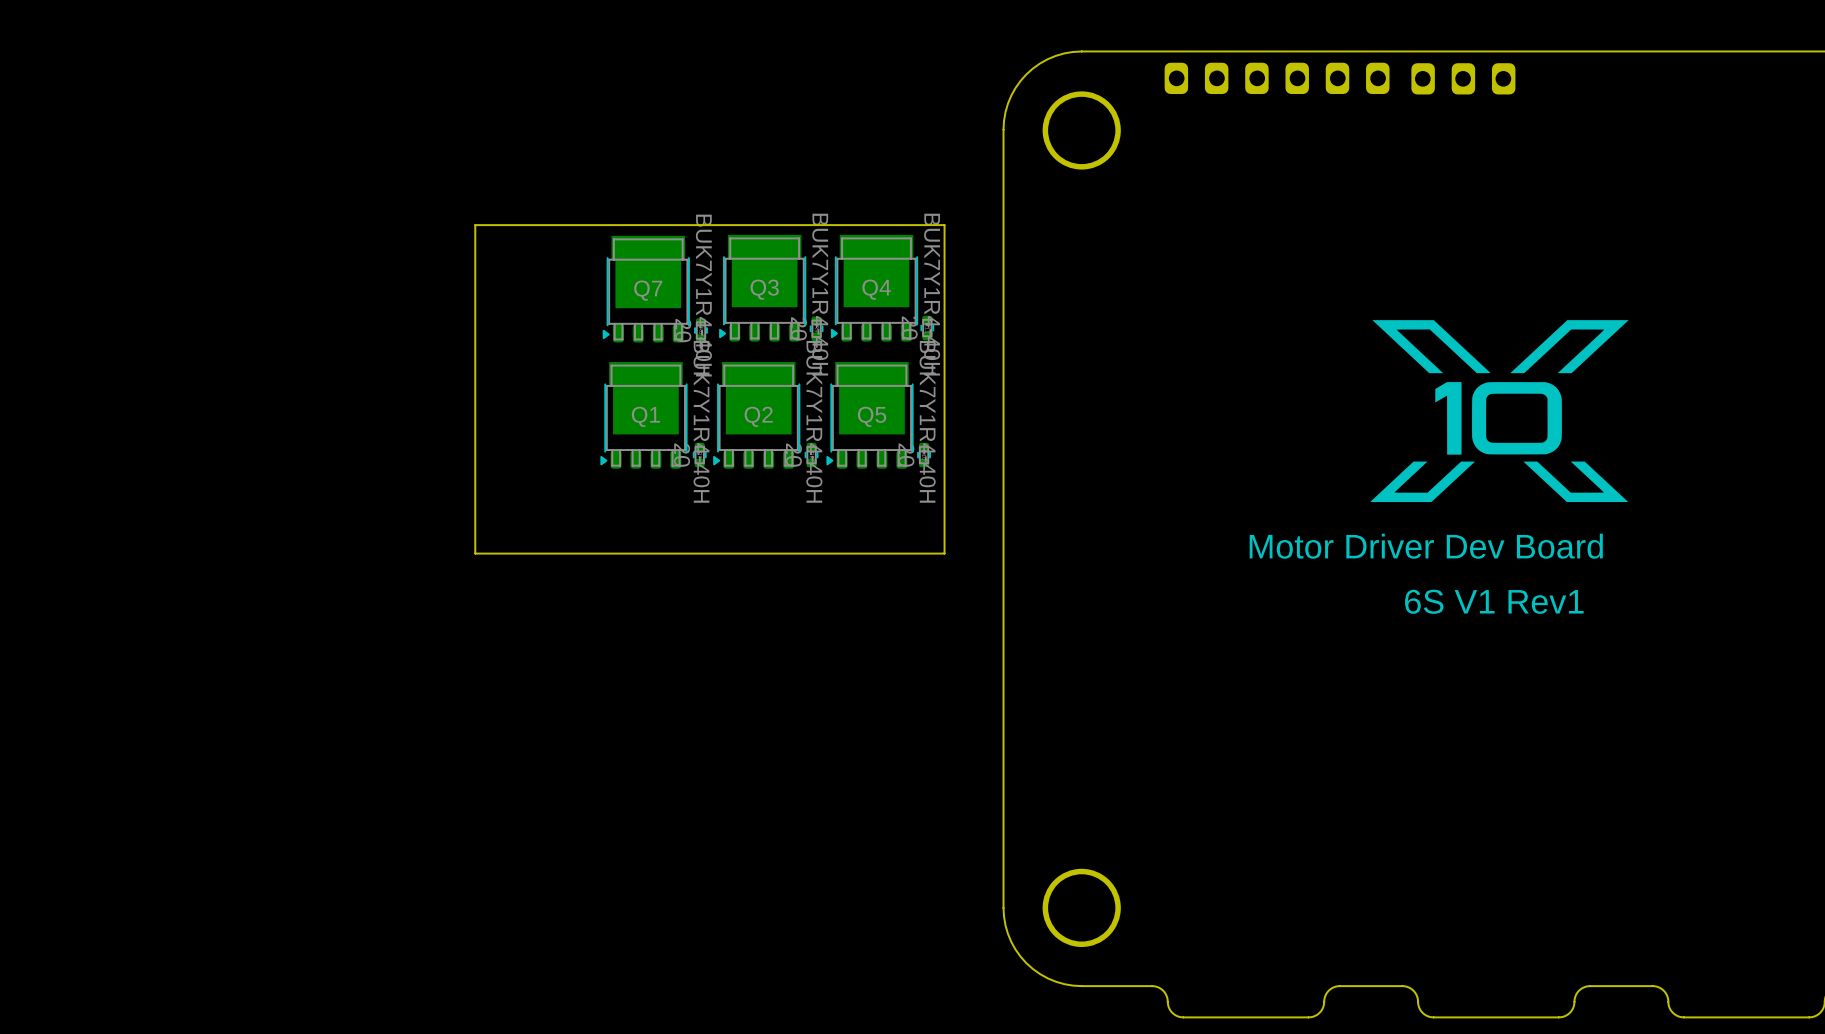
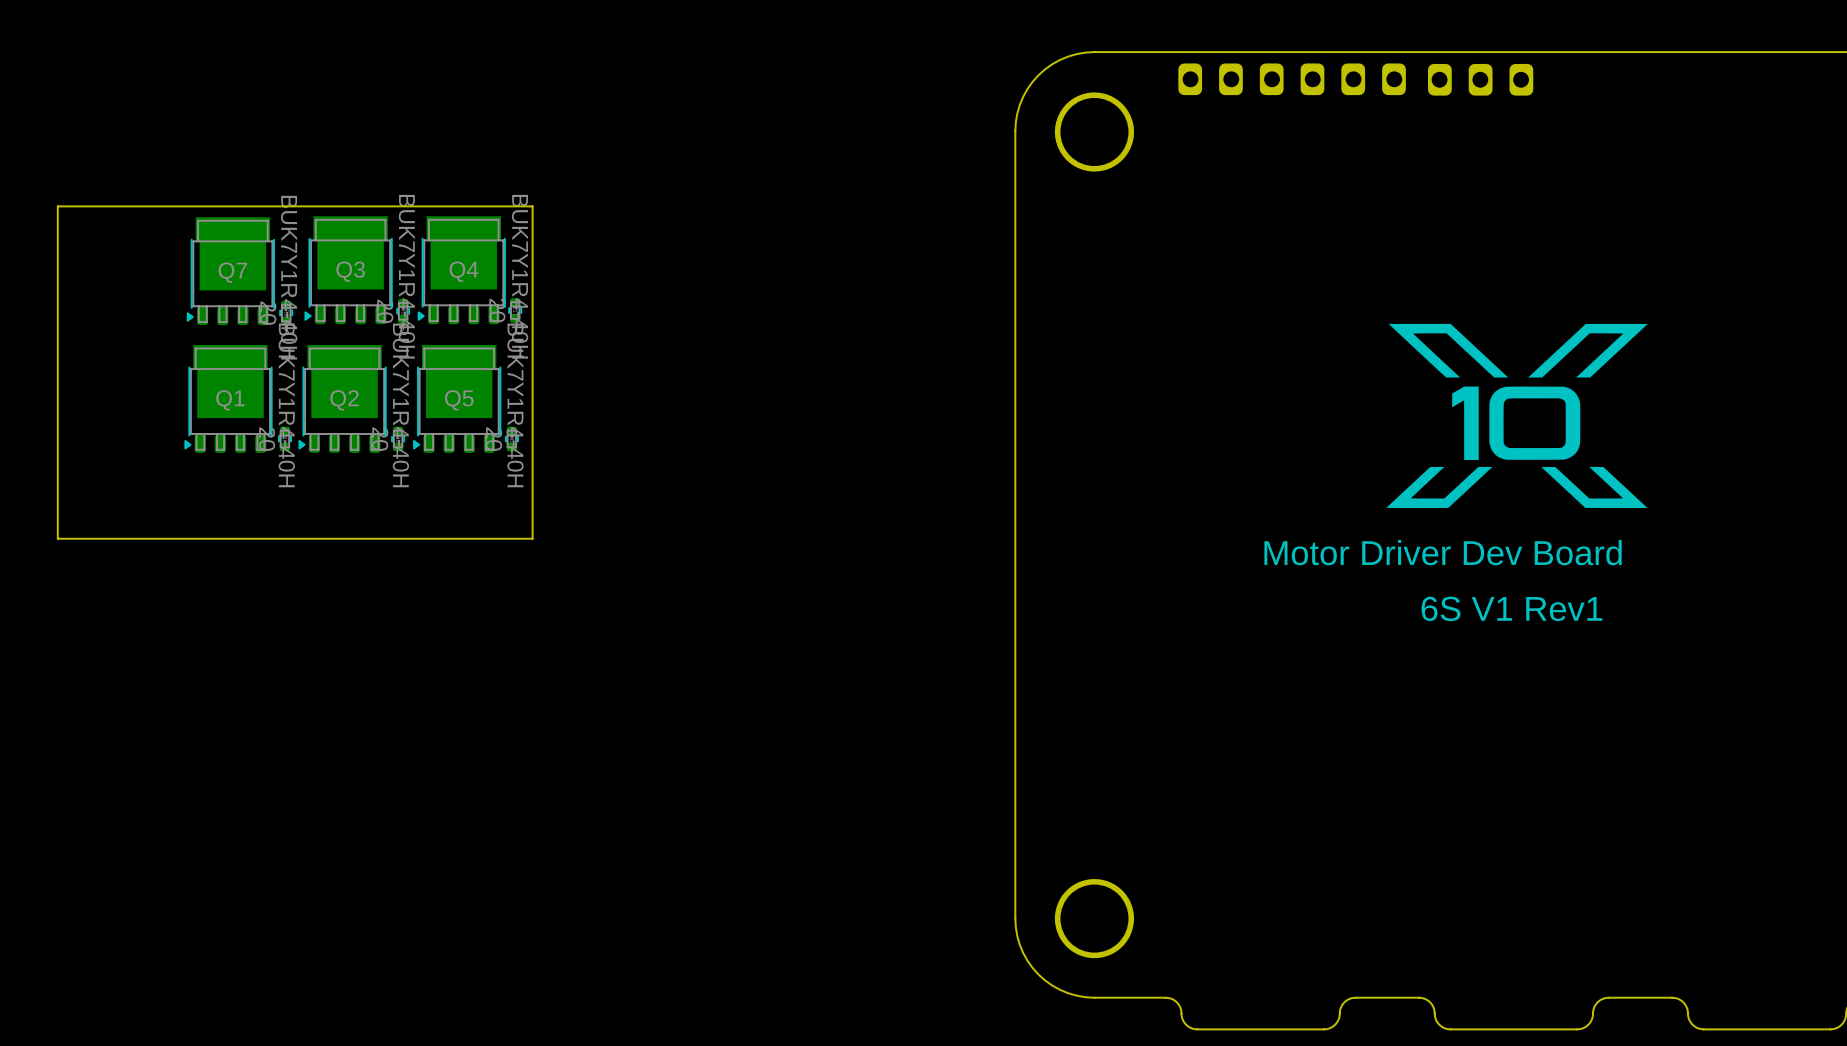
board edge: none -> (532, 206) (57, 206) (57, 538) (532, 538) (532, 206)
board edge: (944, 225) (475, 225) (475, 553) (944, 553) (944, 225) -> none
Q3 position: (762, 288) -> (348, 270)
Q4 position: (874, 288) -> (461, 270)
Q7 position: (646, 289) -> (230, 271)
part position: (816, 328) -> (403, 311)
part position: (927, 328) -> (515, 310)
part position: (700, 330) -> (286, 313)
Q1 position: (643, 415) -> (228, 398)
Q2 position: (756, 415) -> (342, 398)
Q5 position: (869, 415) -> (457, 398)
part position: (699, 455) -> (284, 439)
part position: (811, 455) -> (398, 439)
part position: (924, 455) -> (511, 439)

